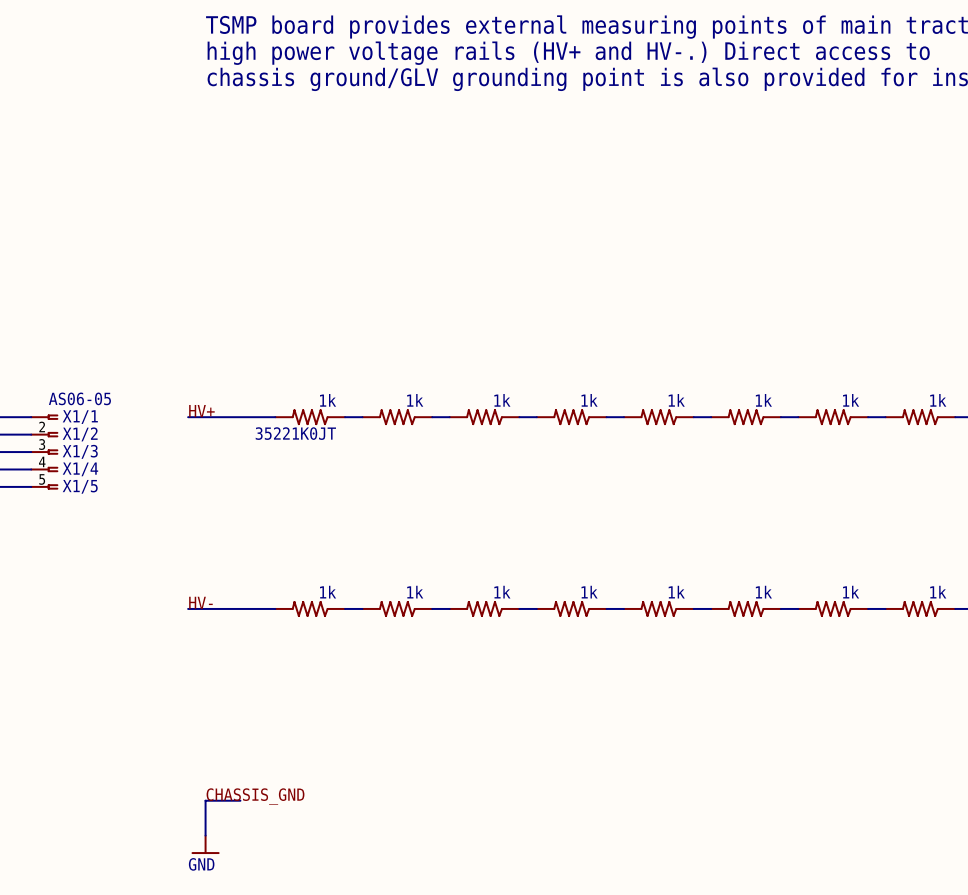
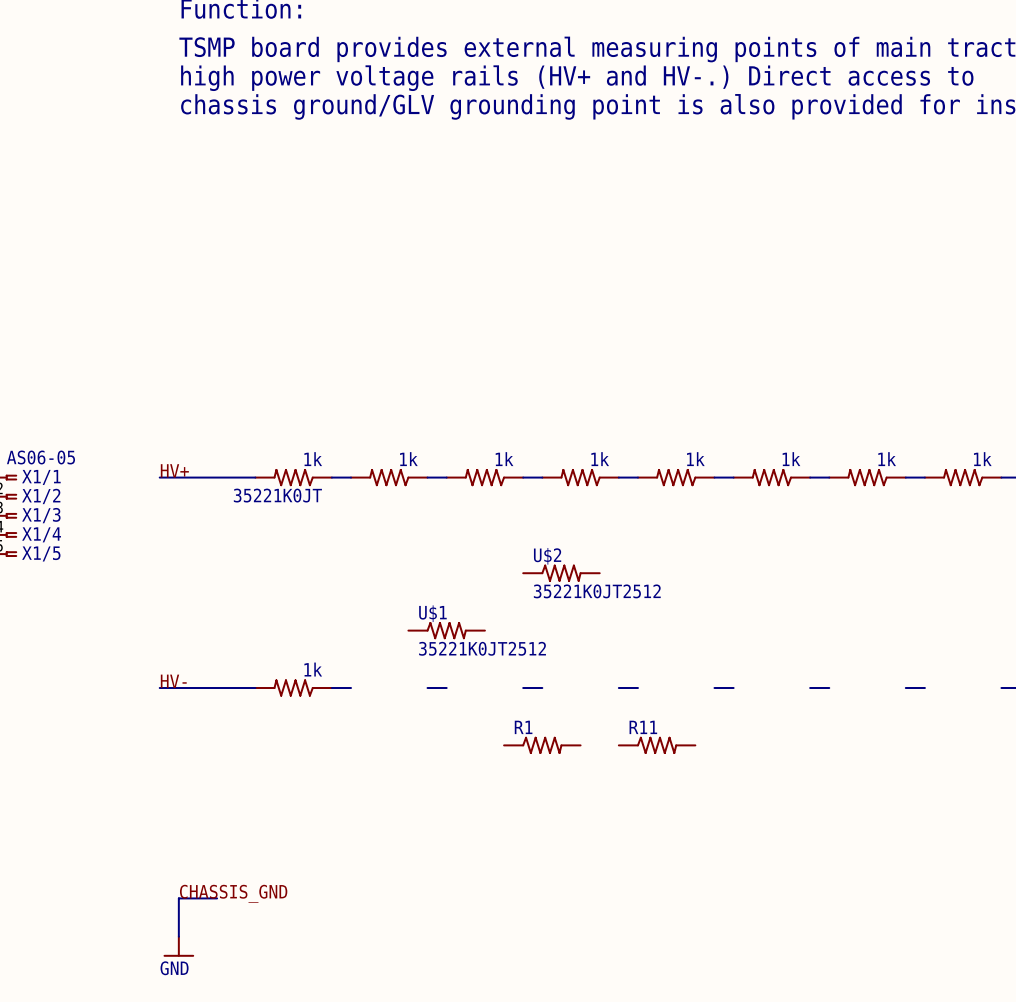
U$2: none -> 35221K0JT2512 (561, 573)
U$1: none -> 35221K0JT2512 (446, 630)
part: 1k (397, 608) -> none
part: 1k (484, 608) -> none
part: 1k (571, 608) -> none
part: 1k (658, 608) -> none
part: 1k (746, 608) -> none
part: 1k (833, 608) -> none
part: 1k (920, 608) -> none
R1: none -> (542, 745)
R11: none -> (657, 745)

